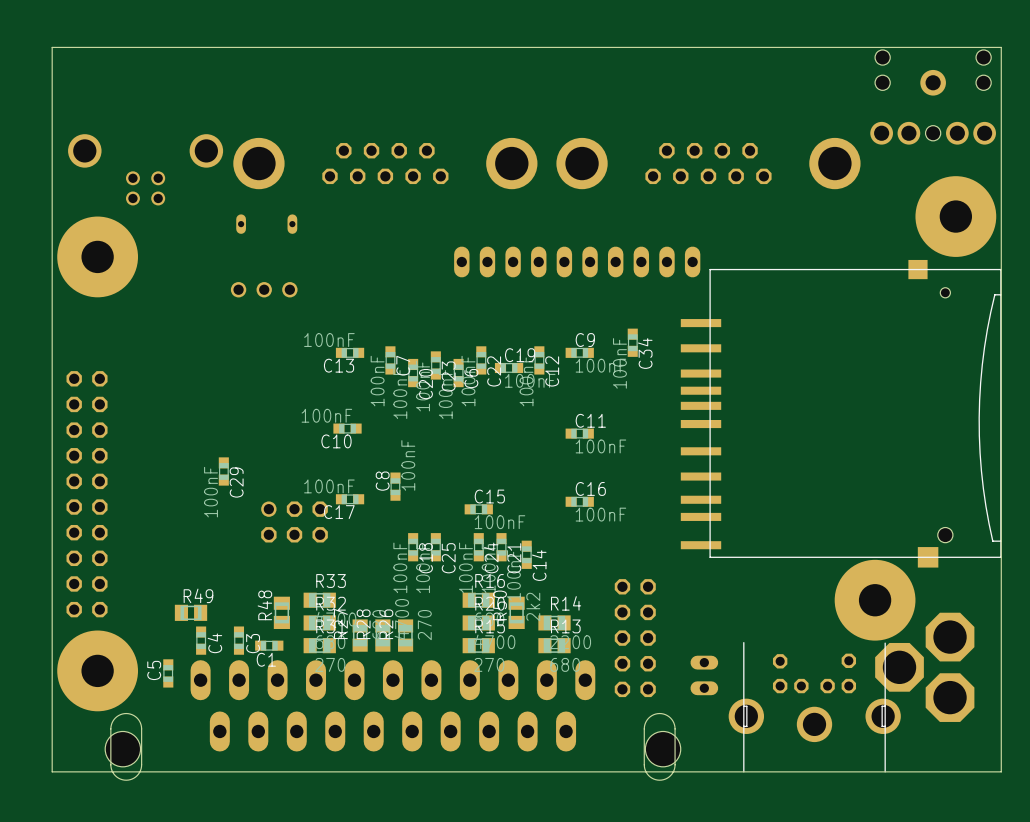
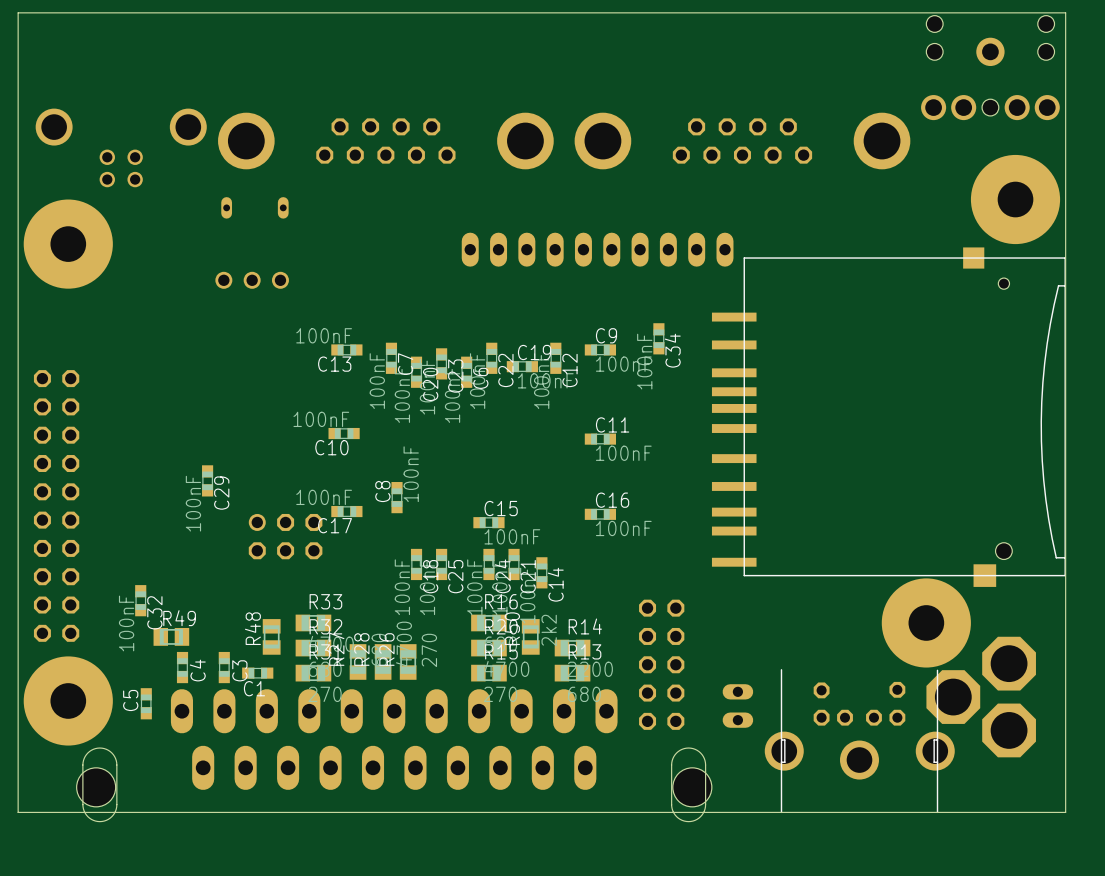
C32: none -> 100nF (140, 600)

